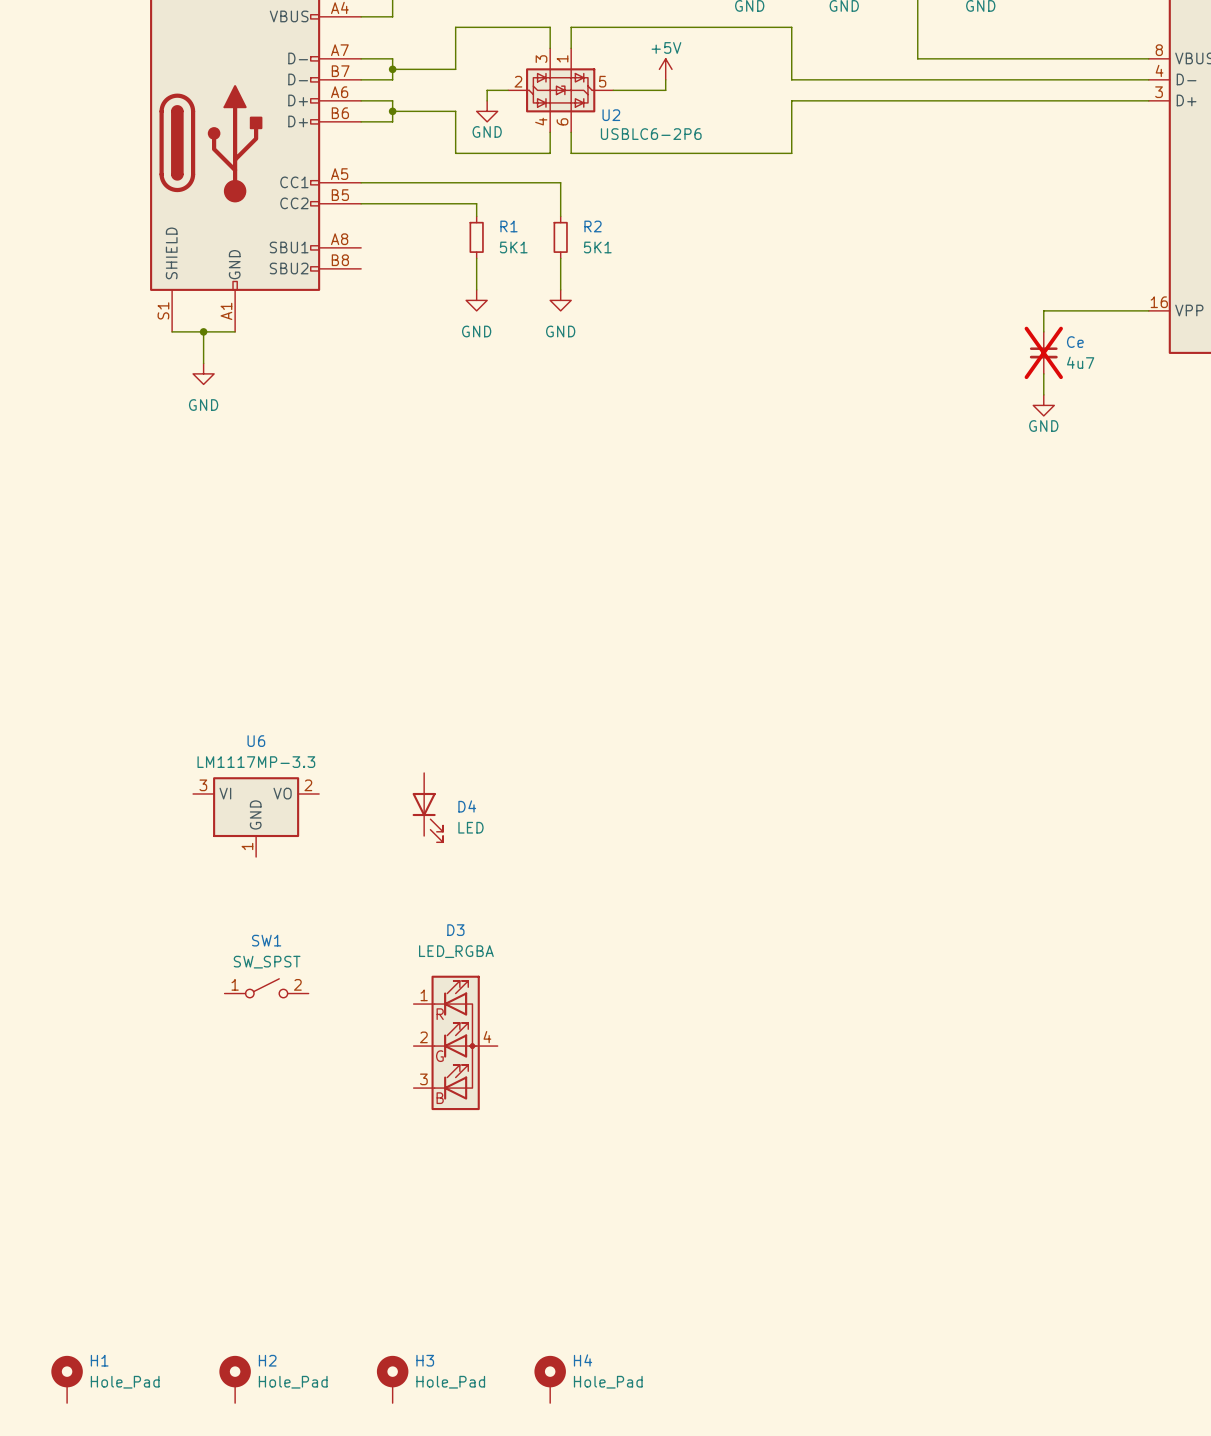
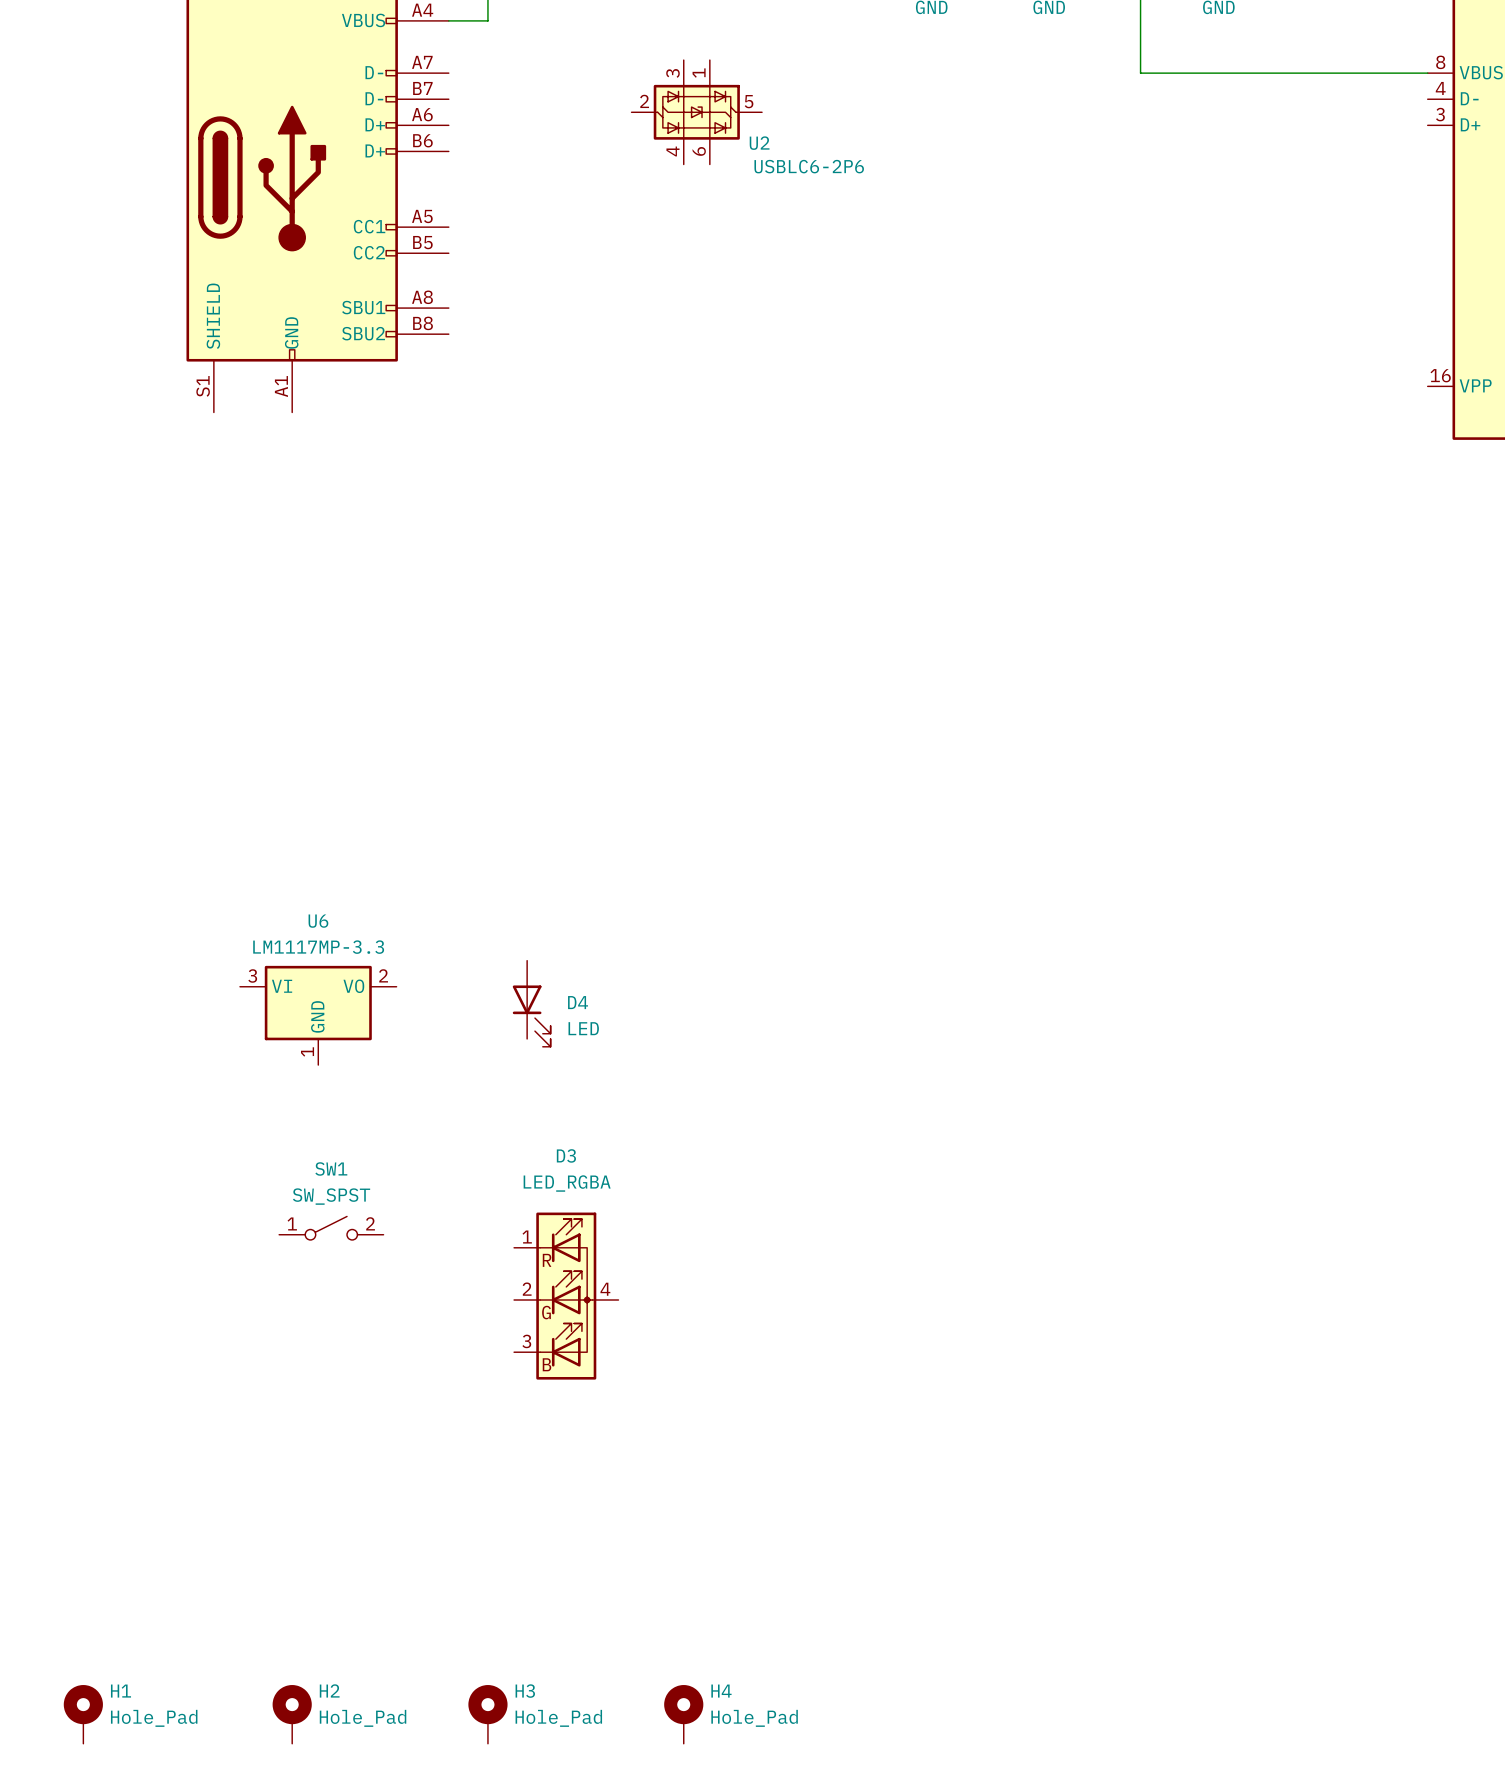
wire: (550, 48) (550, 27) (455, 27) (455, 69) (392, 69) -> none
wire: (571, 48) (571, 27) (791, 27) (791, 79) (1148, 79) -> none
wire: (361, 58) (392, 58) (392, 79) (361, 79) -> none
junction: (392, 69) -> none
power symbol: +5V (665, 69) -> none
wire: (665, 79) (665, 90) (613, 90) -> none
wire: (508, 90) (487, 90) (487, 100) -> none
wire: (361, 100) (392, 100) (392, 121) (361, 121) -> none
wire: (1148, 100) (791, 100) (791, 153) (571, 153) (571, 132) -> none
wire: (392, 111) (455, 111) (455, 153) (550, 153) (550, 132) -> none
junction: (392, 111) -> none
power symbol: GND (487, 111) -> none
wire: (361, 182) (560, 182) (560, 216) -> none
wire: (361, 203) (476, 203) (476, 216) -> none
R1: 5K1 (476, 237) -> none
R2: 5K1 (560, 237) -> none
wire: (476, 258) (476, 289) -> none
wire: (560, 258) (560, 289) -> none
power symbol: GND (476, 300) -> none
power symbol: GND (560, 300) -> none
wire: (1148, 310) (1043, 310) (1043, 331) -> none
wire: (172, 331) (235, 331) -> none
wire: (203, 331) (203, 363) -> none
junction: (203, 331) -> none
Ce: 4u7 (1043, 352) -> none
power symbol: GND (203, 373) -> none
wire: (1043, 373) (1043, 394) -> none
power symbol: GND (1043, 405) -> none

